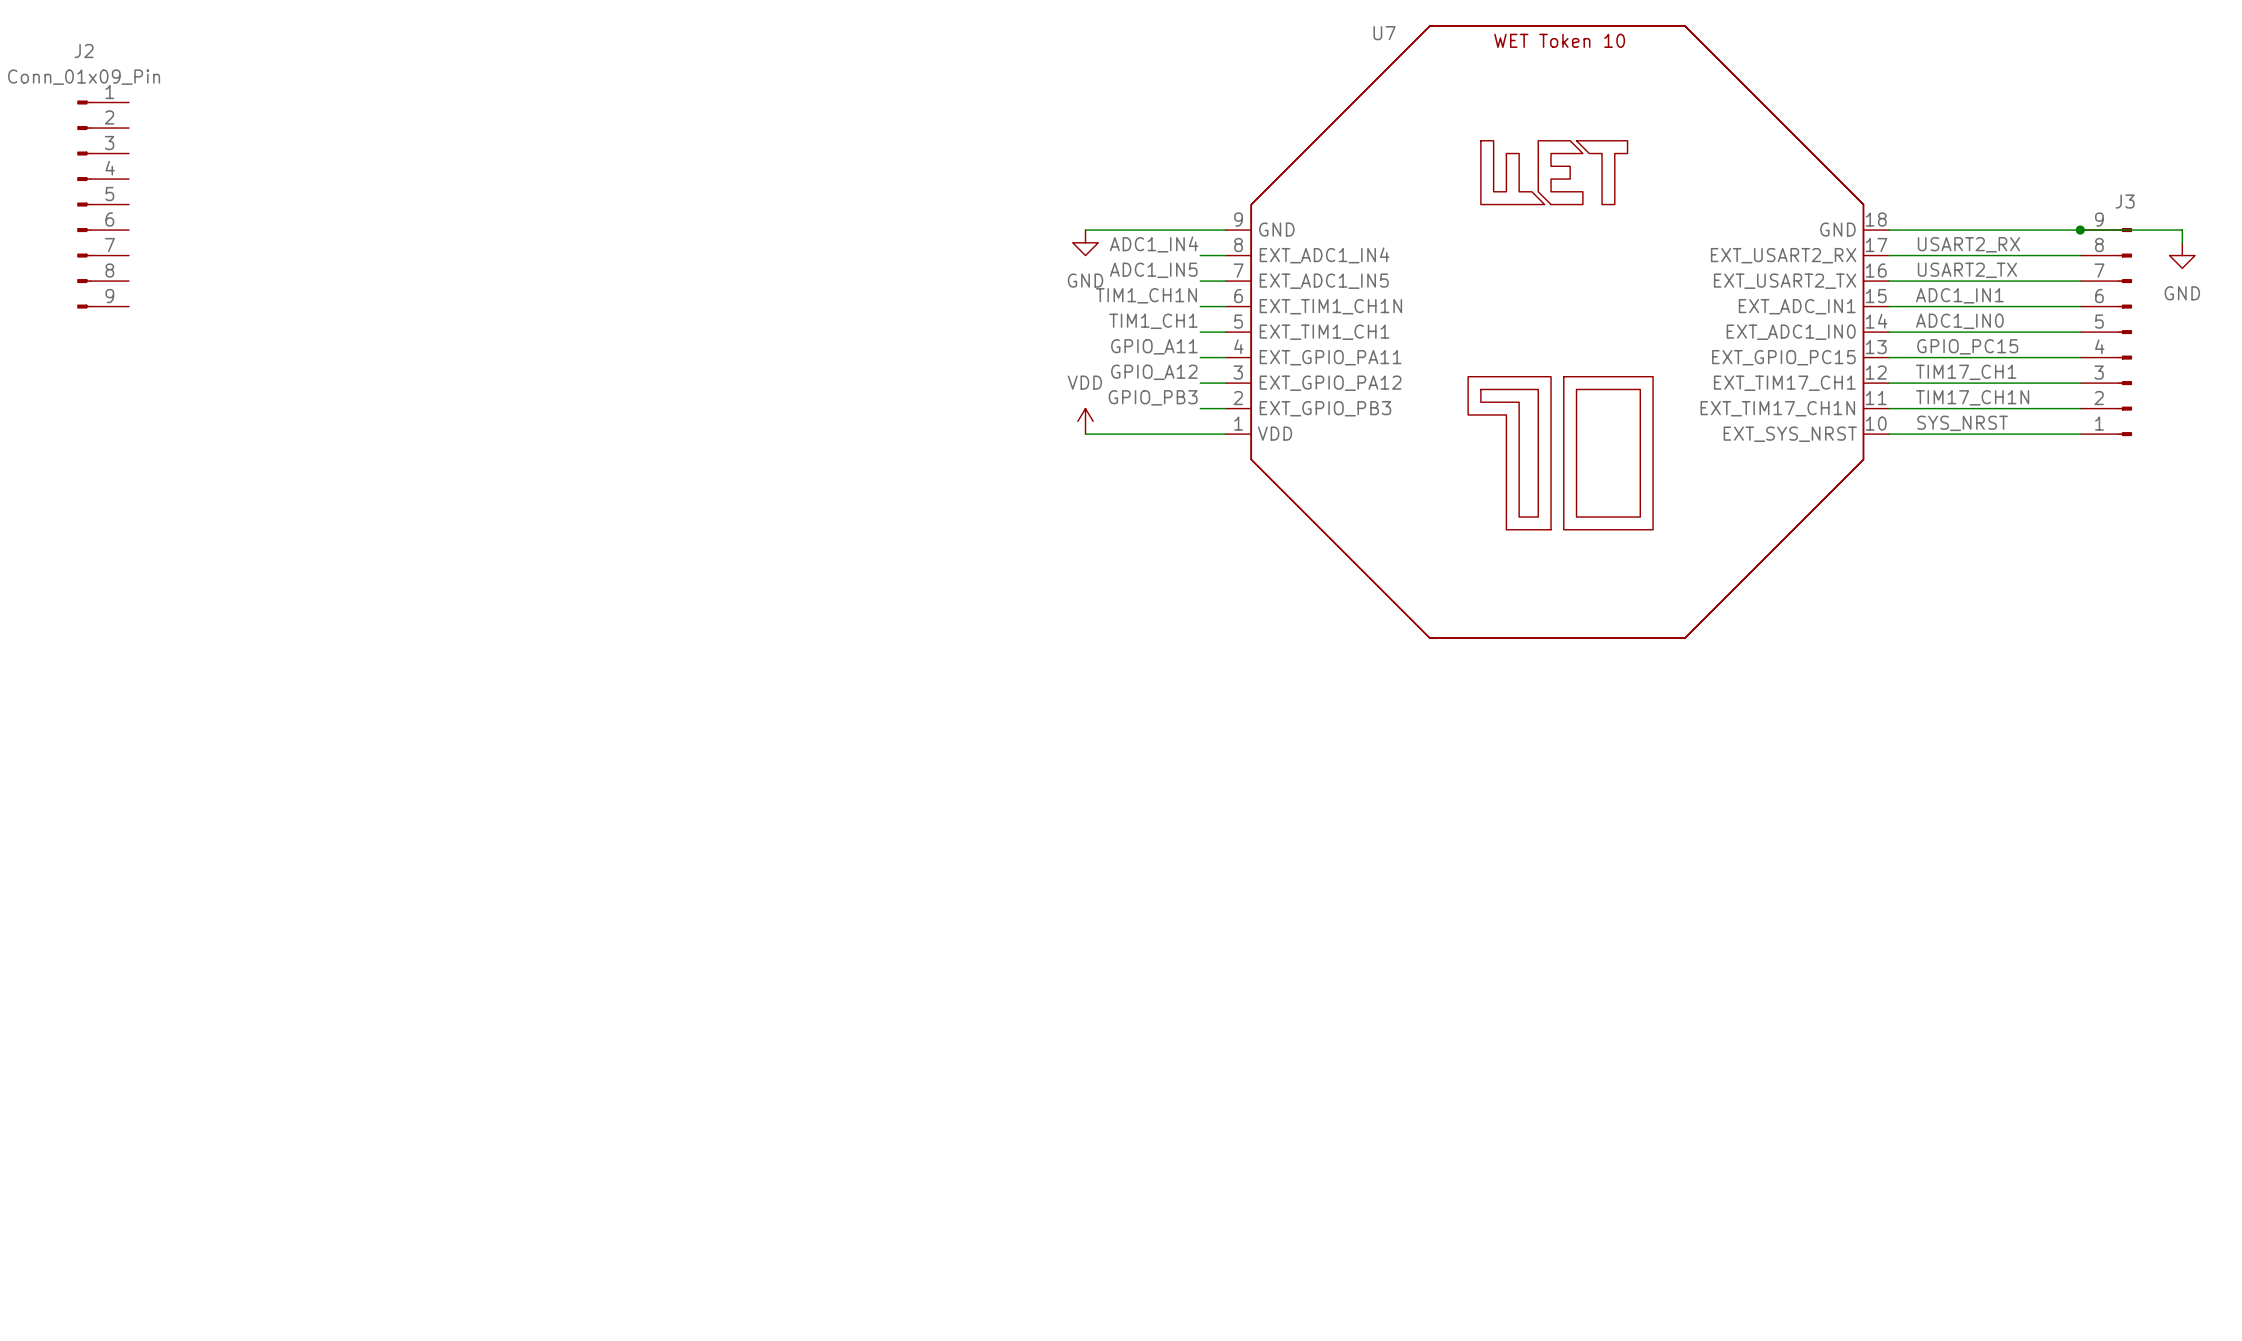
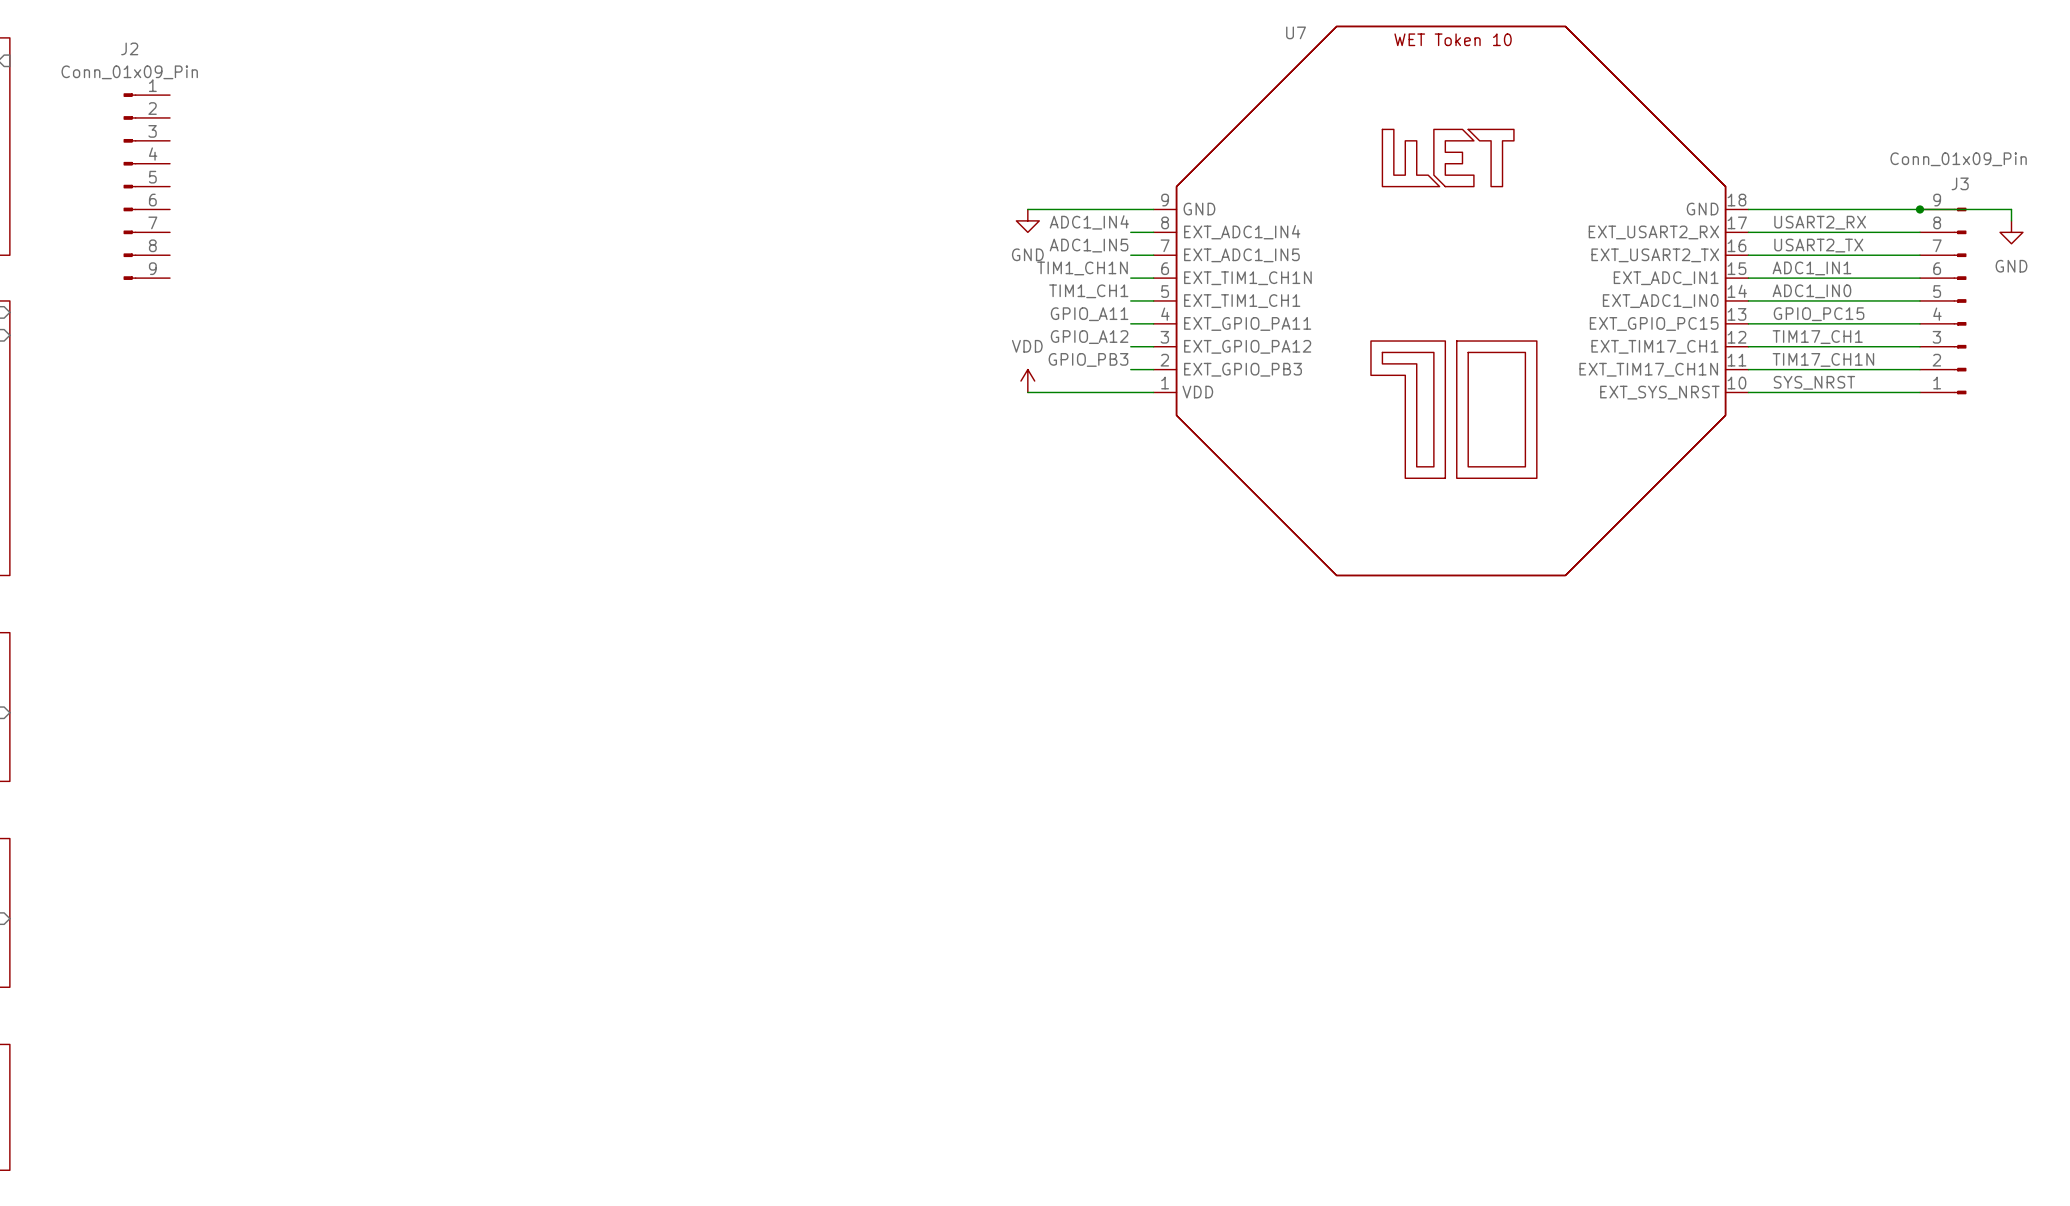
J3 value: none -> Conn_01x09_Pin (1958, 159)

